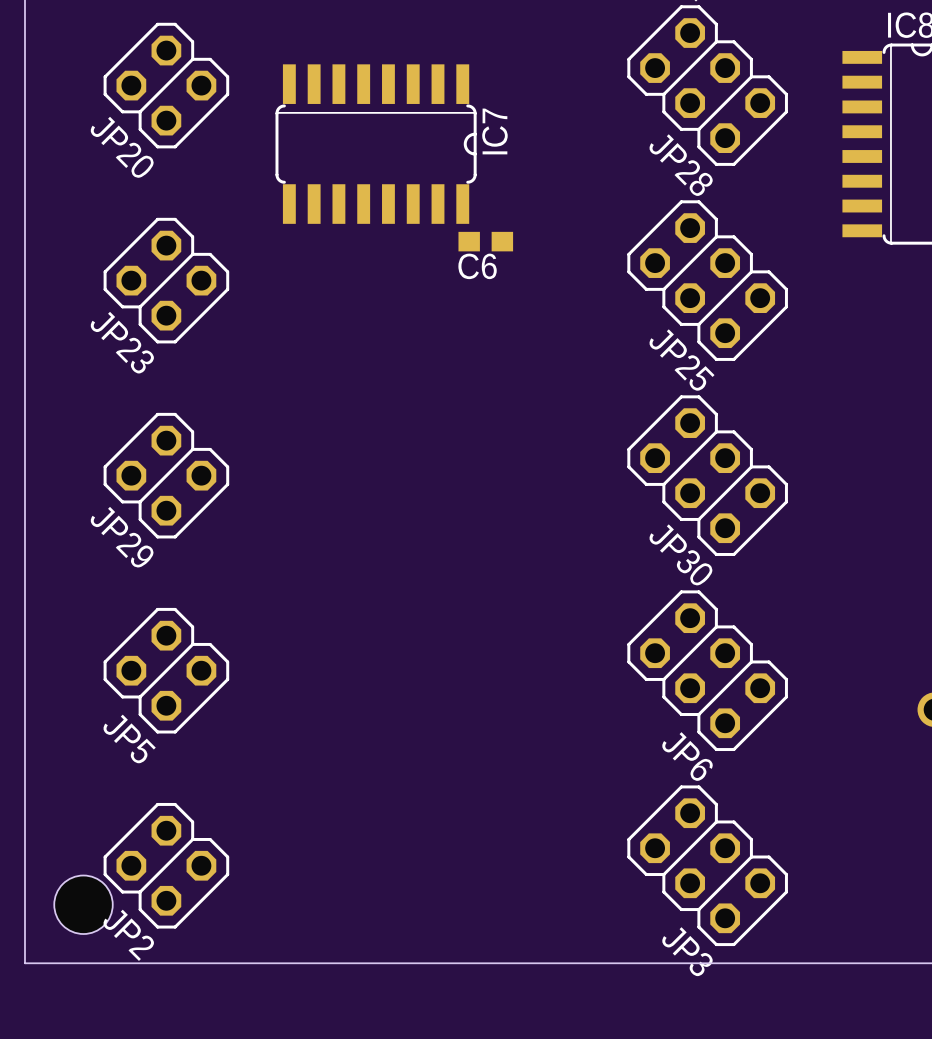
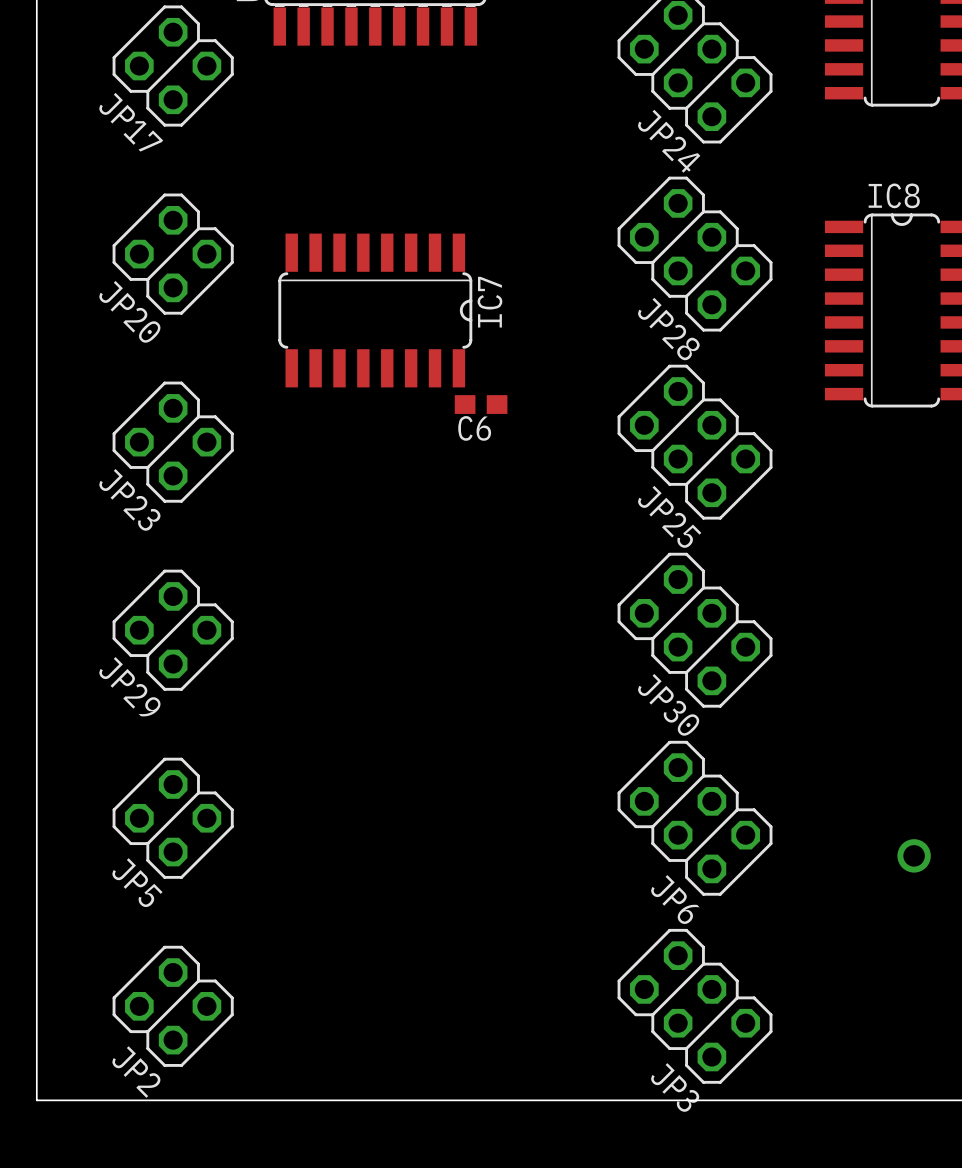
hole: (83, 904) -> none

